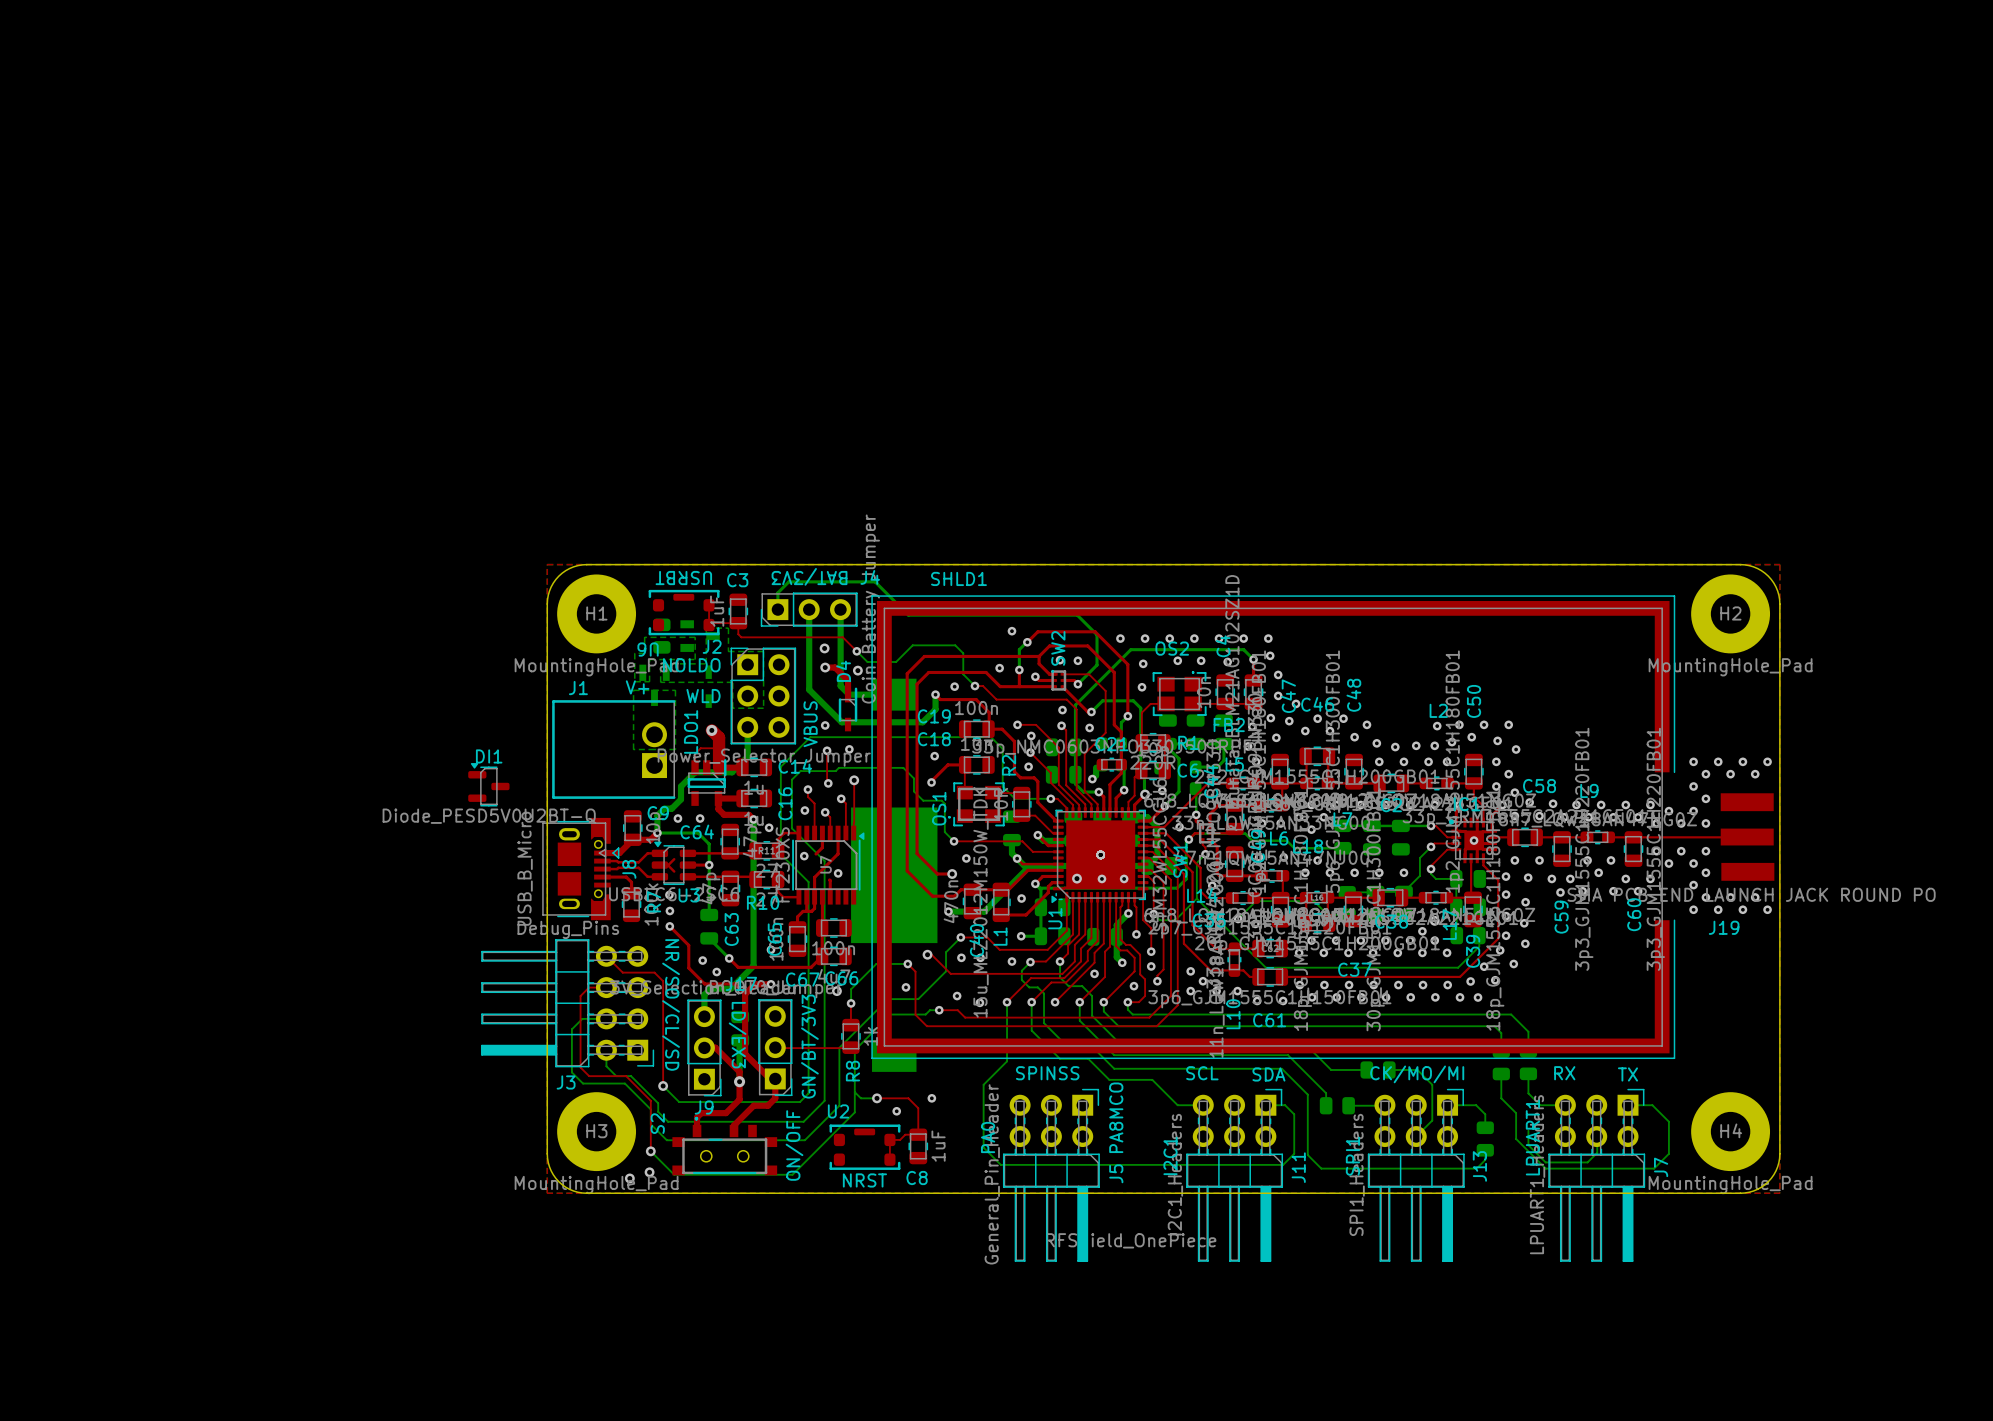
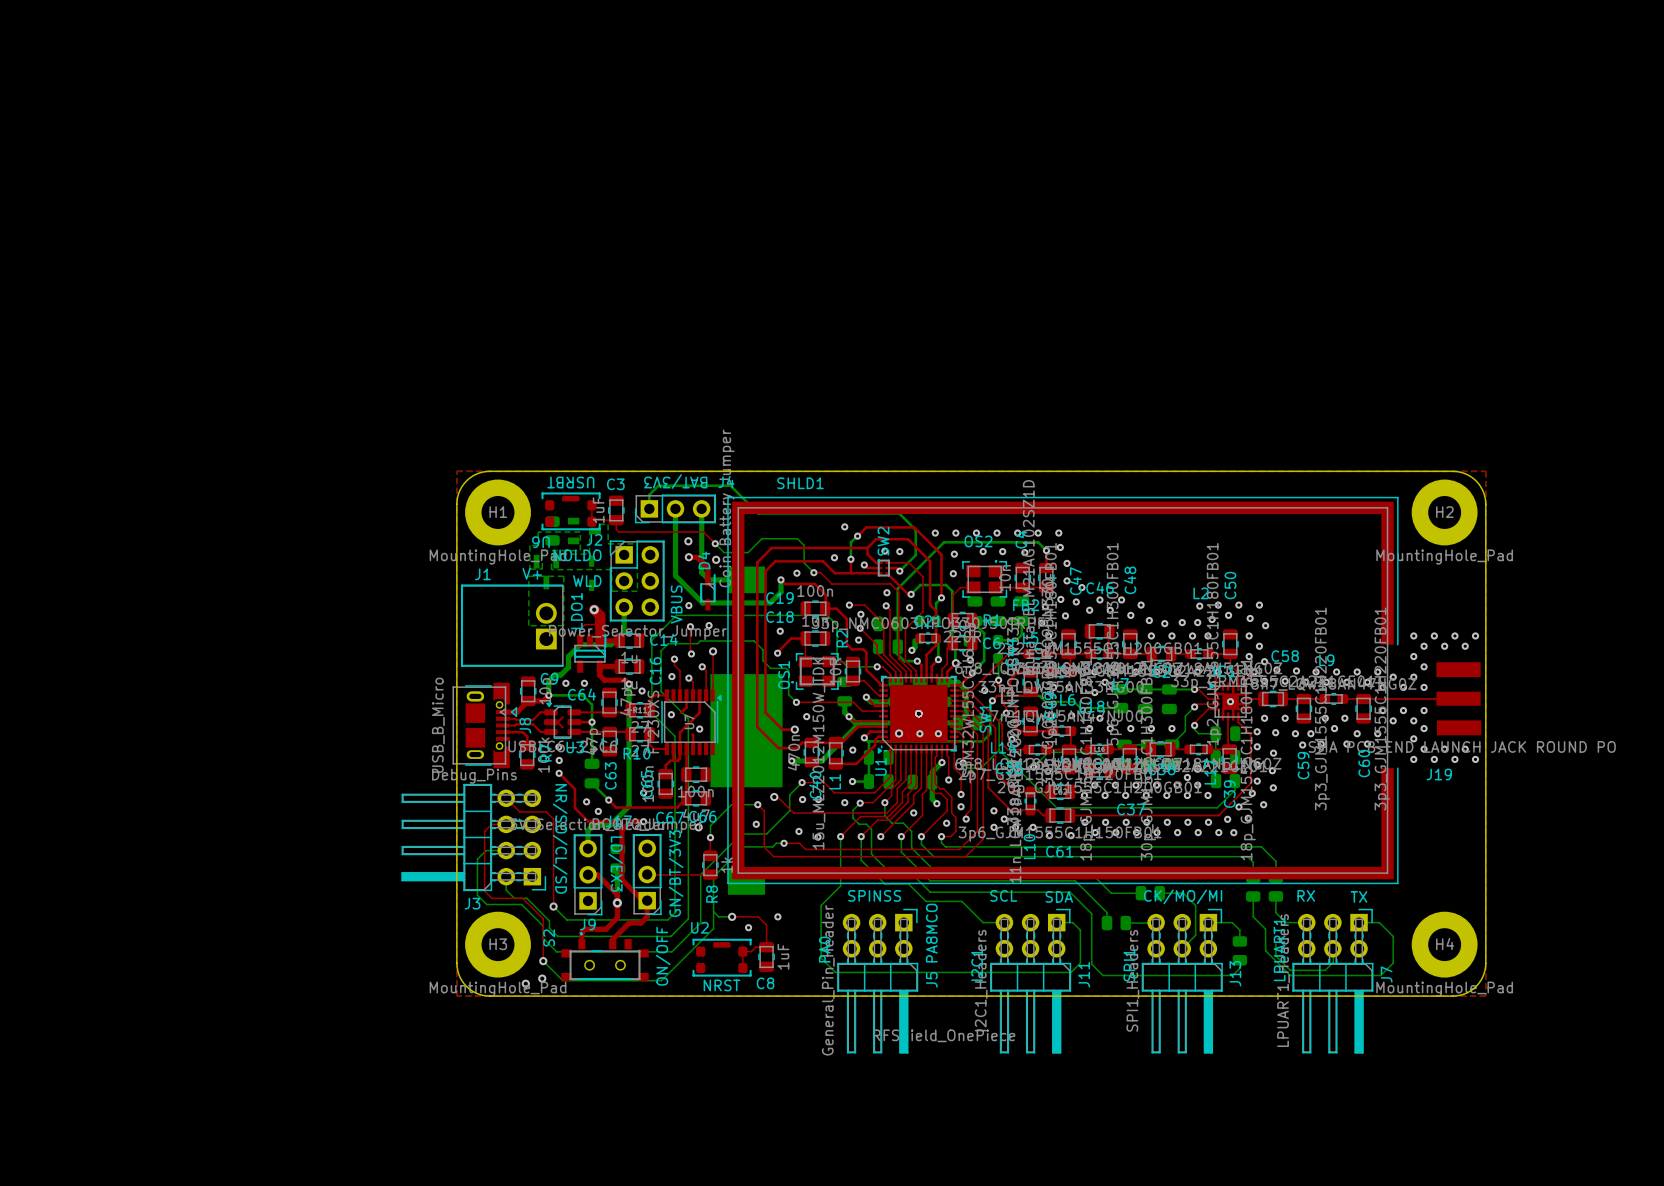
DI1: Diode_PESD5V0U2BT-Q (488, 784) -> none

